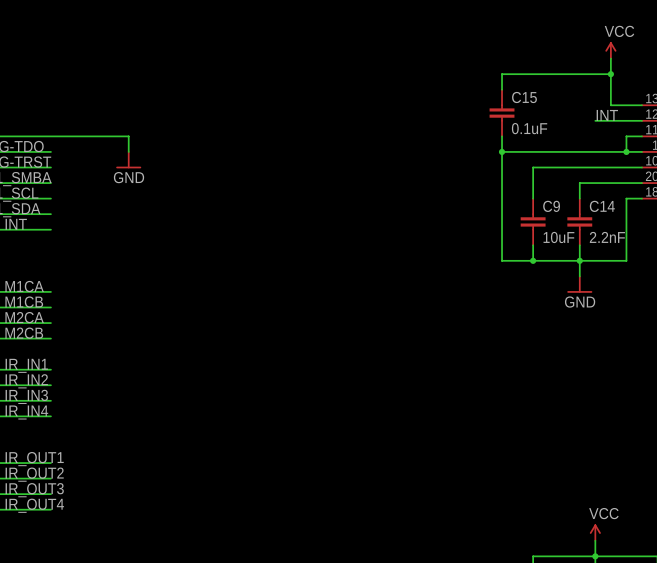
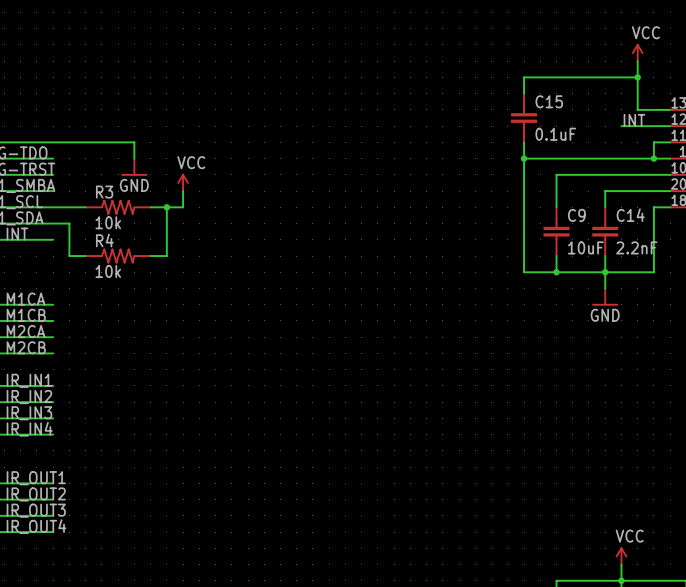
power symbol: none -> VCC (183, 182)
wire: none -> (183, 191) (183, 207) (150, 207)
wire: none -> (53, 207) (85, 207)
R3: none -> 10k (118, 207)
wire: none -> (166, 207) (166, 256) (150, 256)
junction: none -> (166, 207)
wire: none -> (53, 223) (69, 223) (69, 256) (85, 256)
R4: none -> 10k (118, 256)

